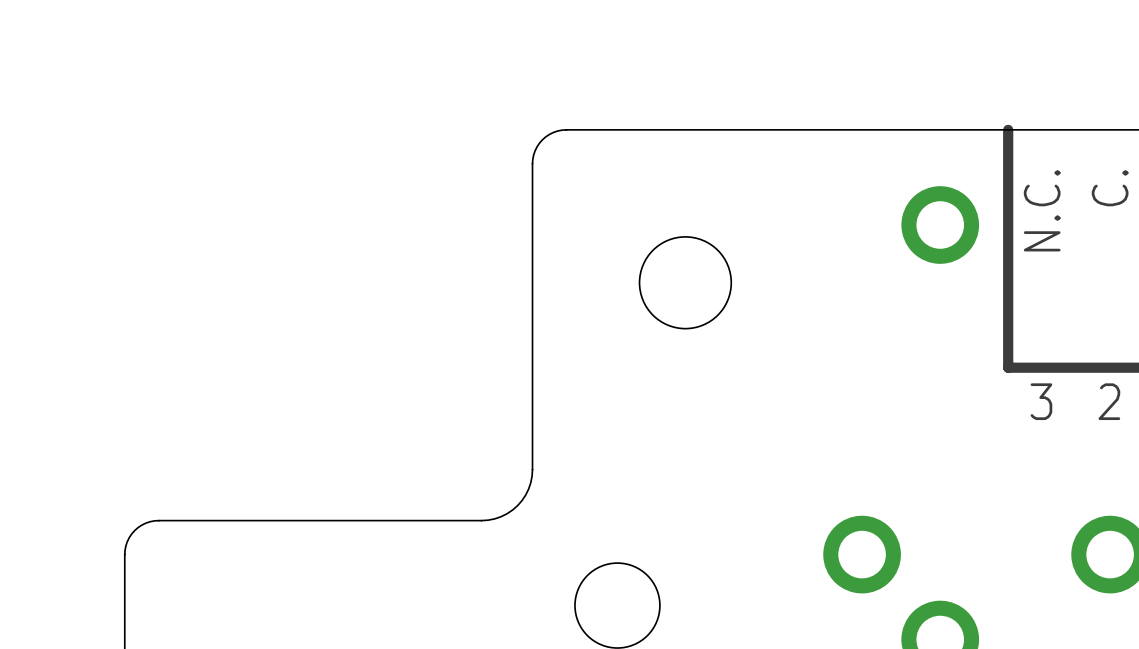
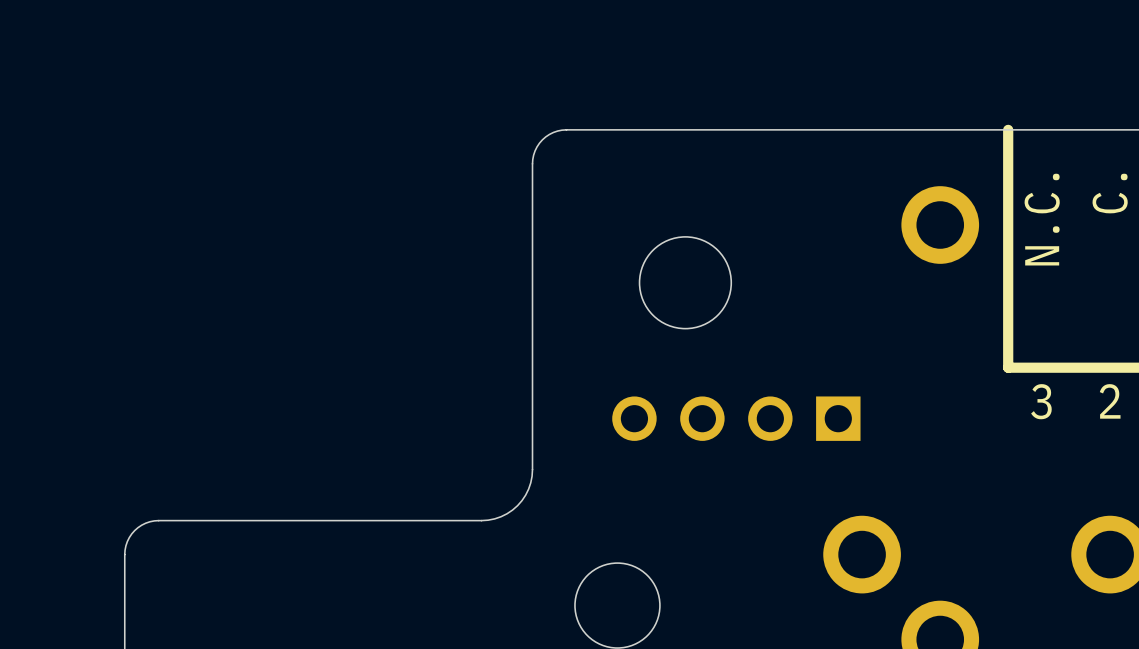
part: none -> (736, 418)

